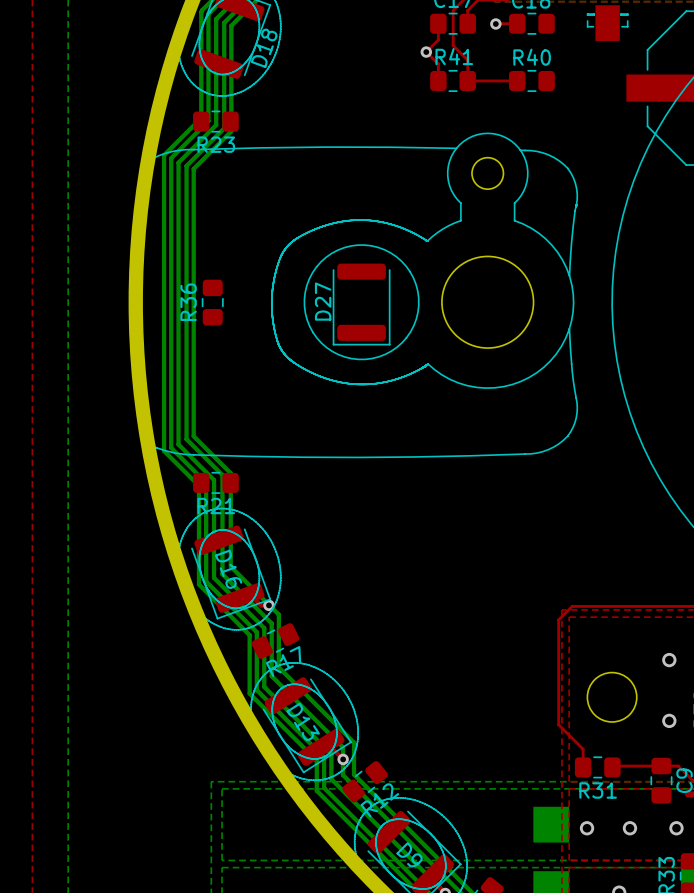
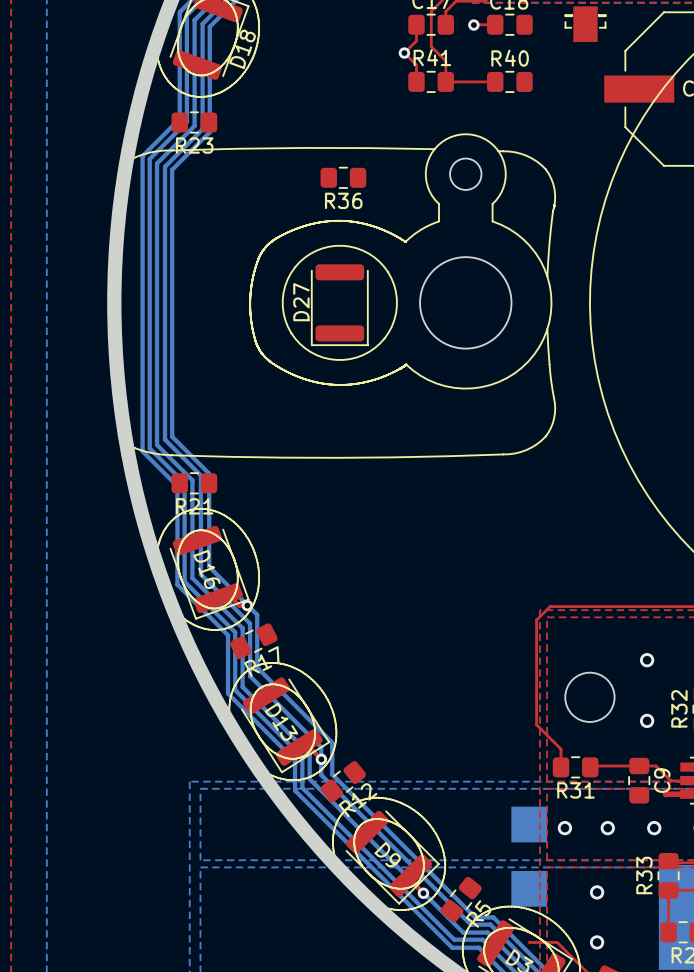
R36 name position: R36 (188, 302) -> R36 (343, 200)
R36 rotation: 0° (212, 302) -> 90° clockwise (343, 177)
R36 position: (212, 302) -> (343, 177)

